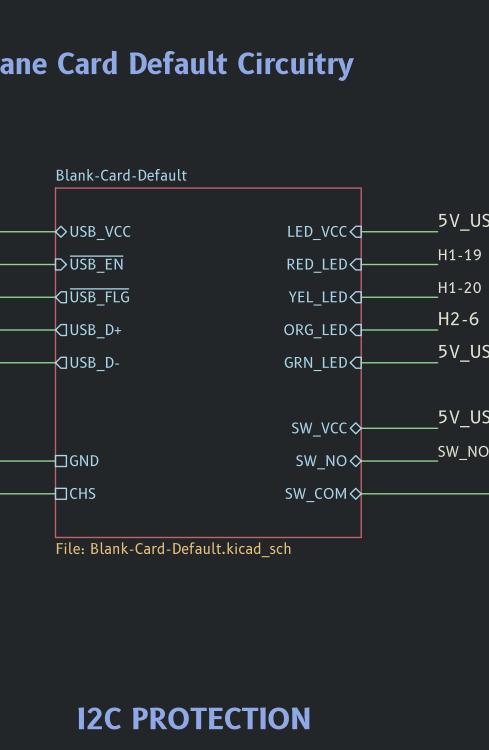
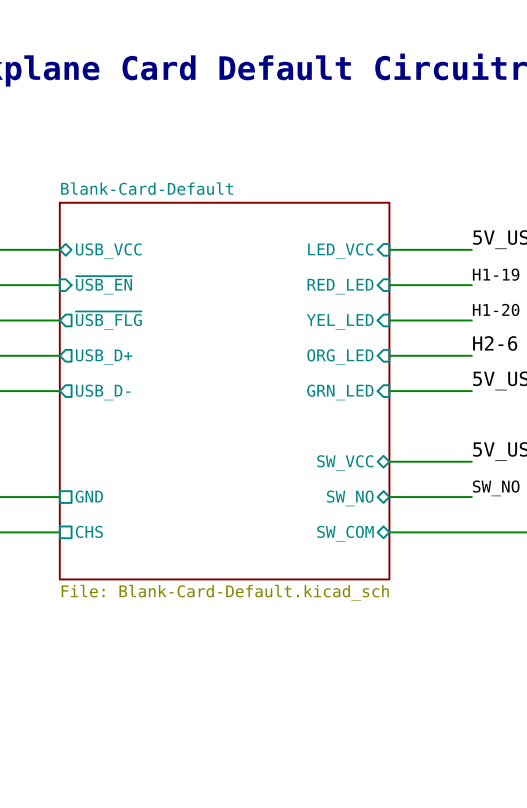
text: I2C PROTECTION (193, 718) -> none

